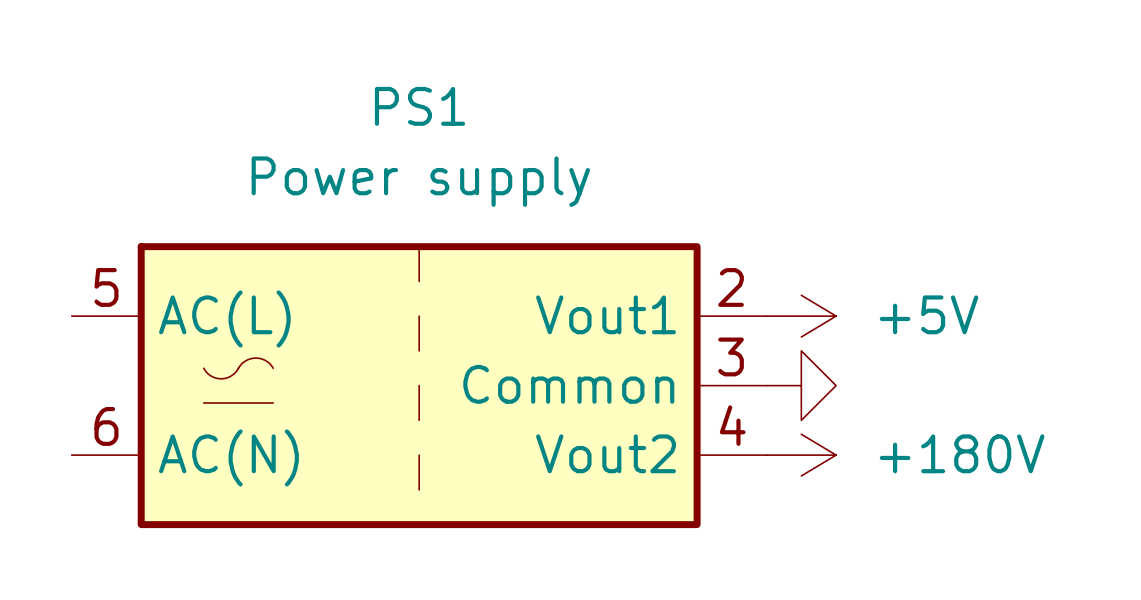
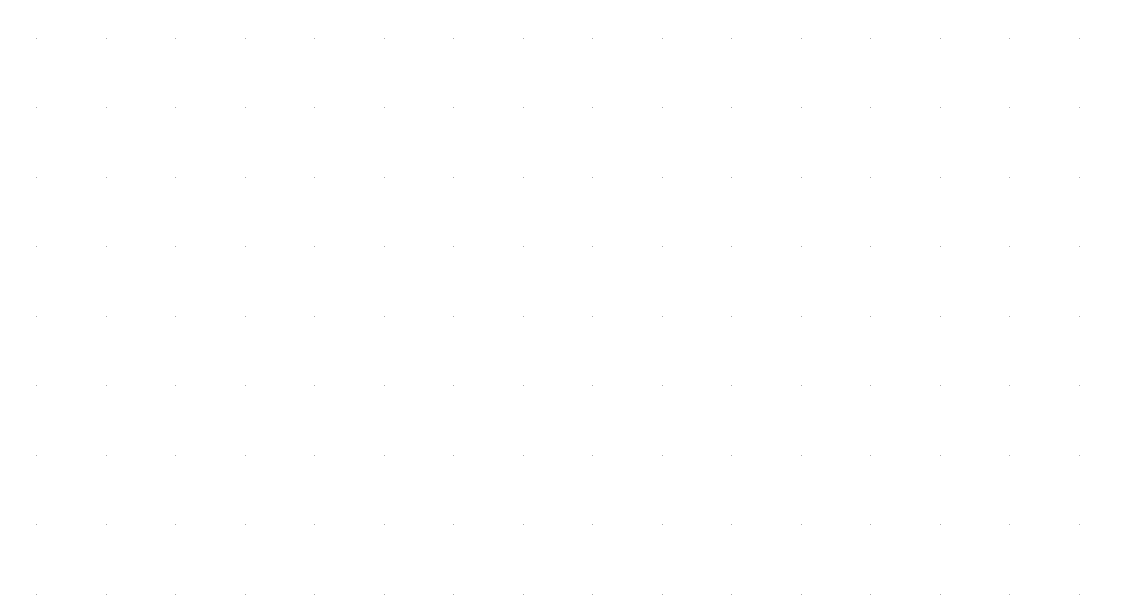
power symbol: +5V (801, 316) -> none
PS1: Power supply (419, 385) -> none
power symbol: (801, 385) -> none
power symbol: +180V (801, 455) -> none

